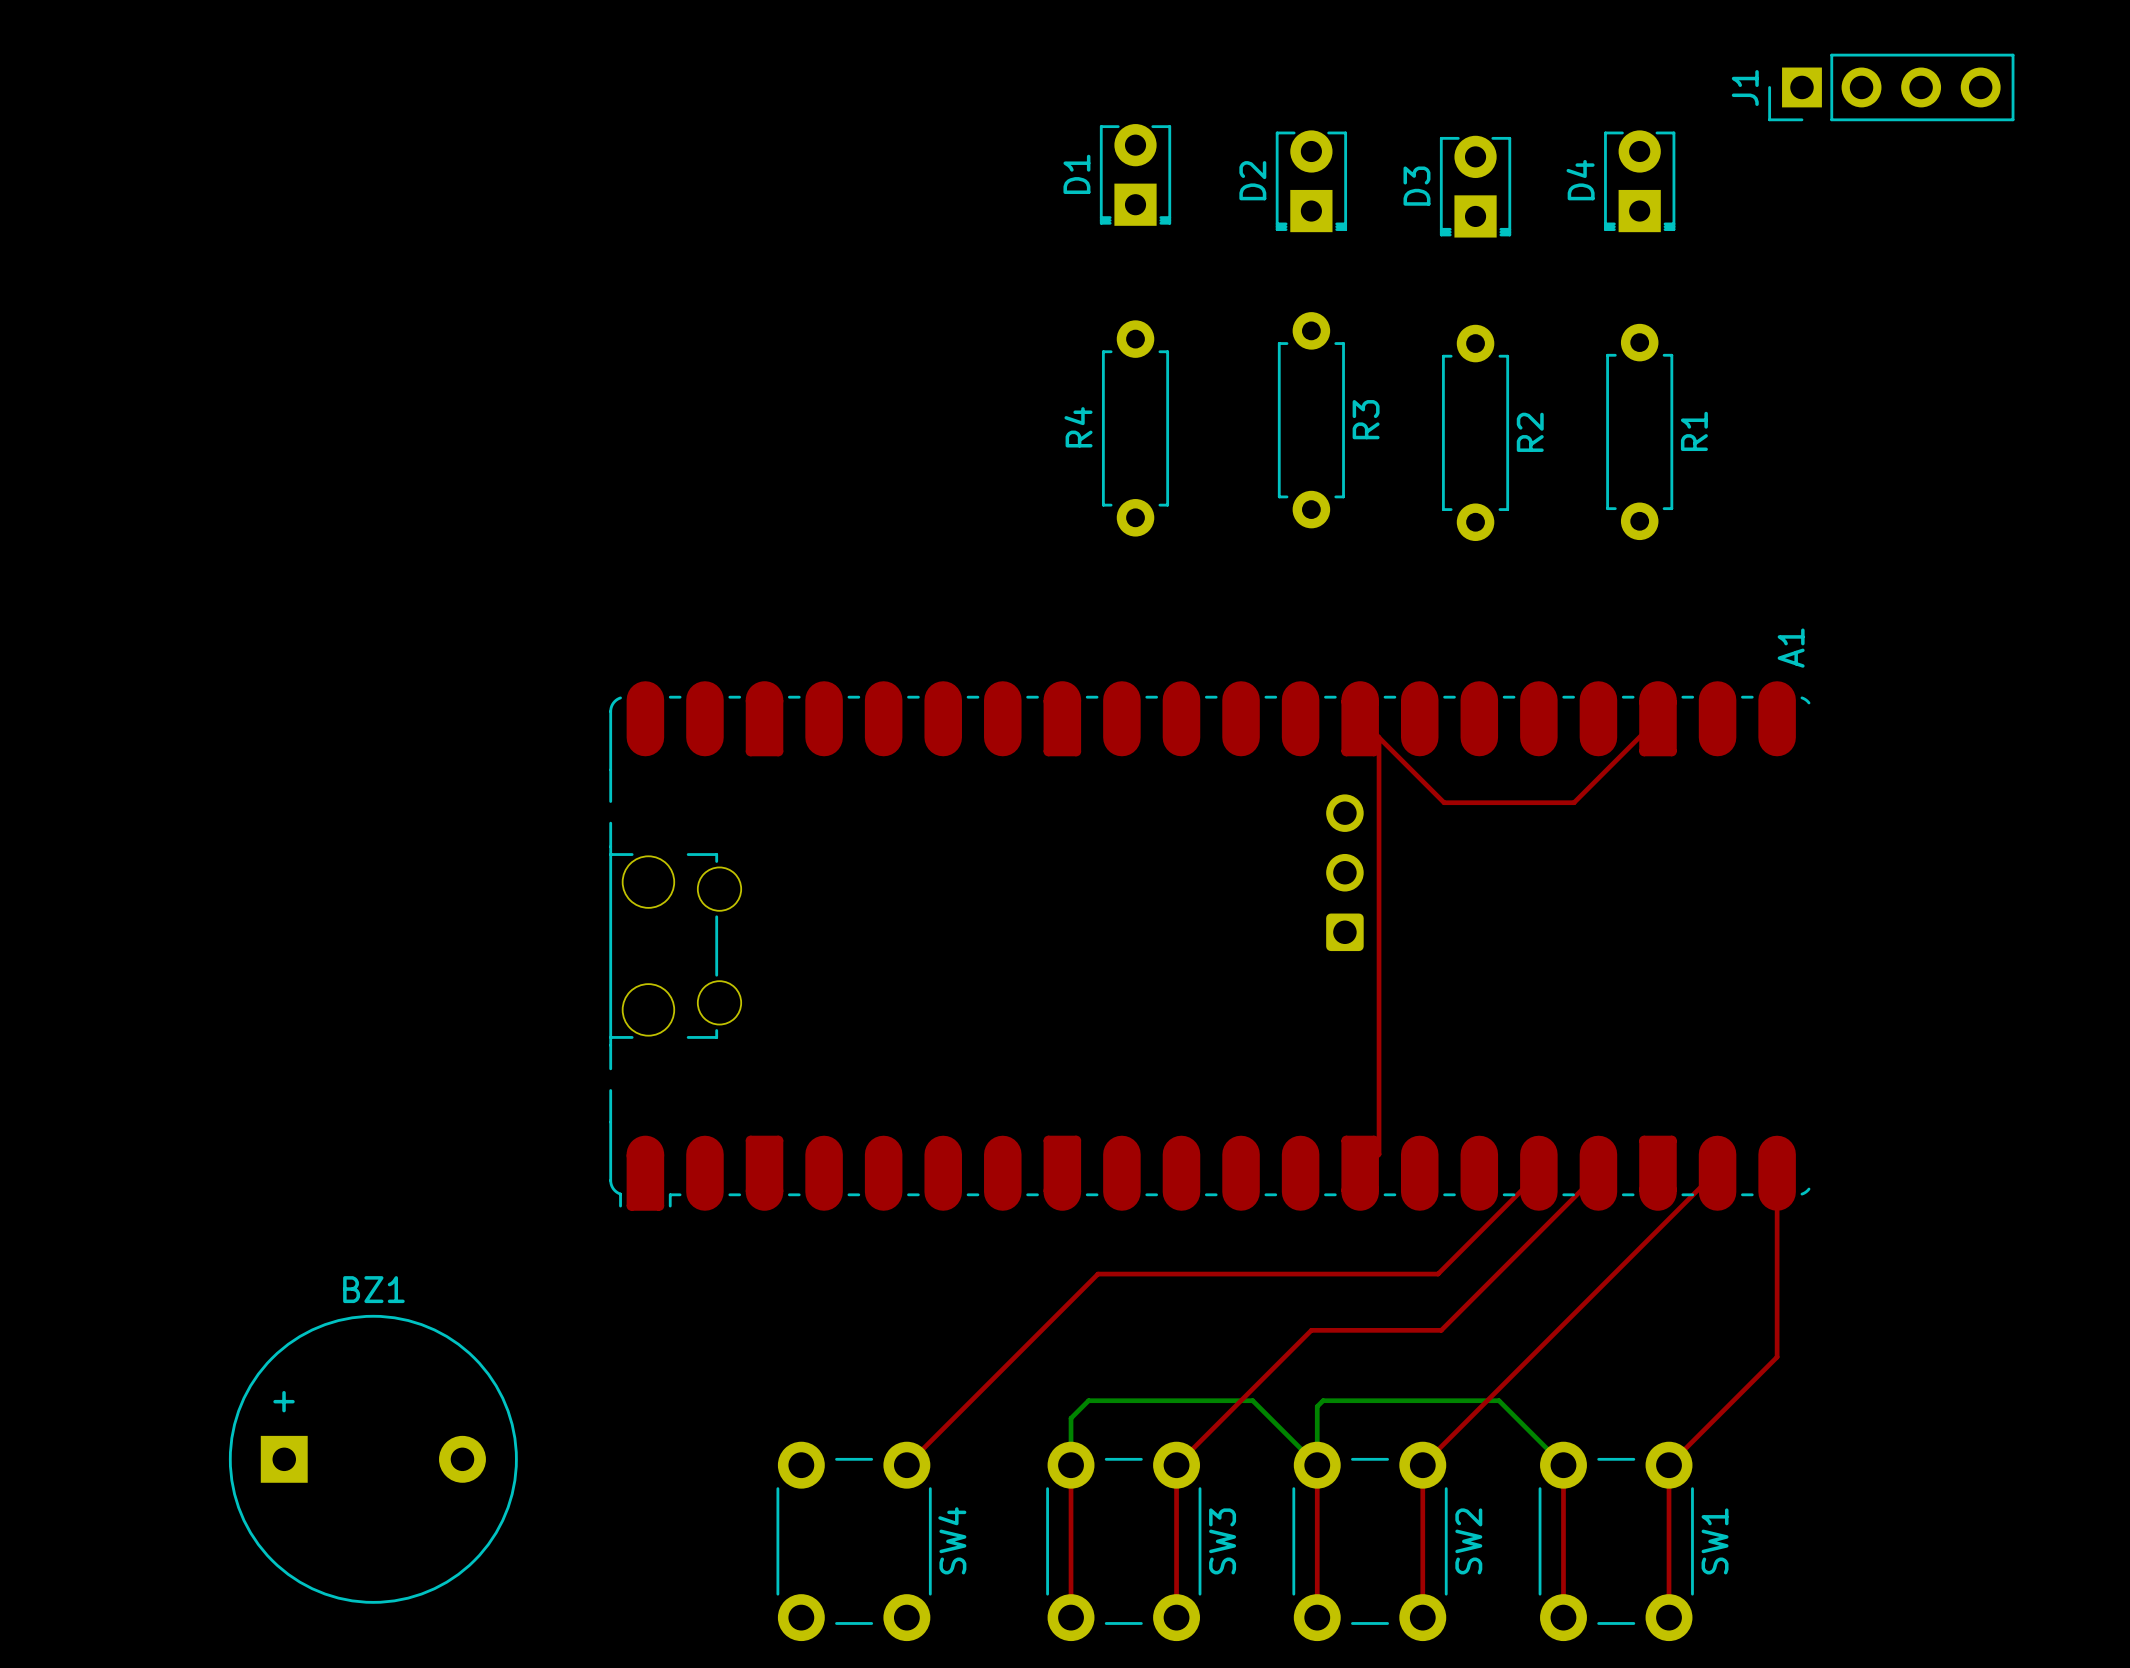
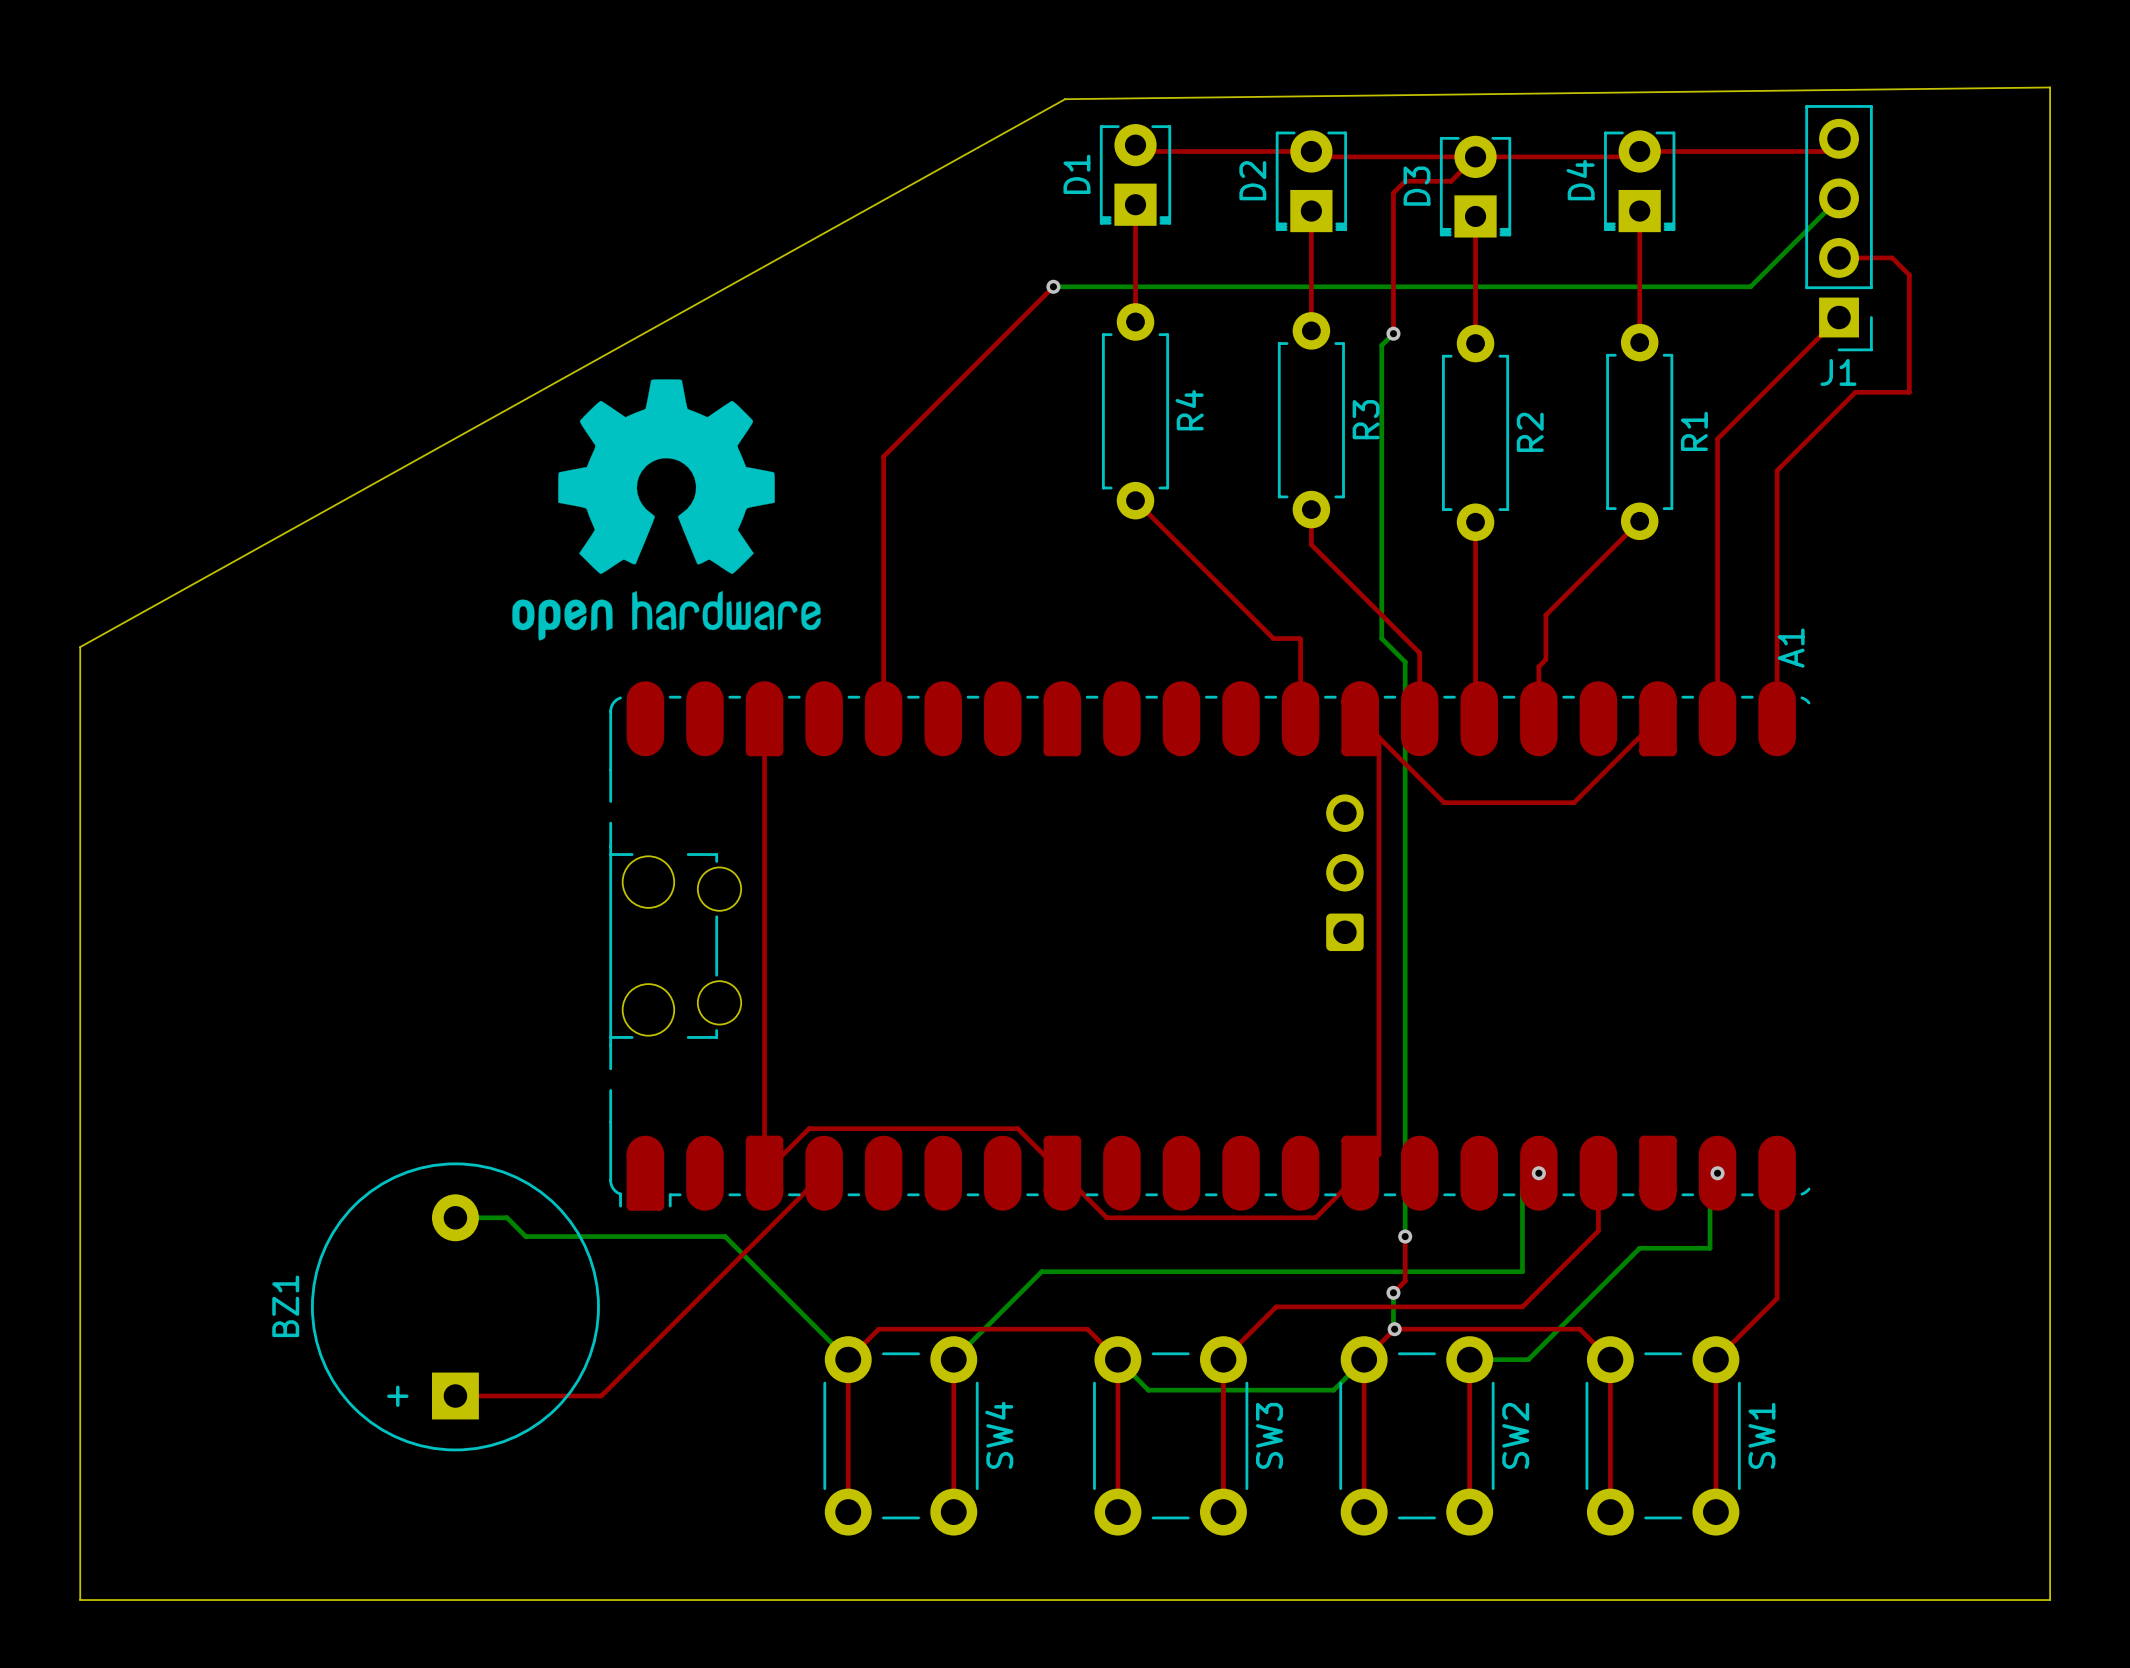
J1 rotation: 0° (1891, 87) -> 90° counterclockwise (1839, 228)
J1 position: (1891, 87) -> (1839, 228)
board edge: none -> (2050, 87) (1065, 99) (80, 647) (80, 1600) (2050, 1600) (2050, 87)
top track: none -> (1839, 138) (1826, 151) (1639, 151) (1634, 156) (1316, 156) (1311, 151) (1141, 151) (1135, 145)
top track: none -> (1475, 156) (1451, 181) (1405, 181) (1393, 192) (1393, 333)
bottom track: none -> (1839, 198) (1750, 286) (1053, 286)
top track: none -> (1135, 204) (1135, 321)
top track: none -> (1311, 211) (1311, 330)
top track: none -> (1639, 211) (1639, 342)
top track: none -> (1475, 216) (1475, 343)
top track: none -> (1839, 257) (1892, 257) (1909, 275) (1909, 392) (1855, 392) (1777, 470) (1777, 718)
top track: none -> (1053, 286) (883, 456) (883, 718)
via: none -> (1053, 286)
top track: none -> (1839, 317) (1717, 438) (1717, 718)
bottom track: none -> (1393, 333) (1381, 345) (1381, 638) (1405, 662) (1405, 1236)
via: none -> (1393, 333)
drawing: none -> [512, 379, 821, 641]
R4 name position: R4 (1078, 427) -> R4 (1189, 410)
R4 position: (1135, 428) -> (1135, 411)
top track: none -> (1135, 500) (1273, 638) (1300, 639) (1300, 718)
top track: none -> (1311, 509) (1311, 544) (1419, 653) (1419, 718)
top track: none -> (1639, 521) (1545, 615) (1545, 659) (1538, 666) (1538, 718)
top track: none -> (1475, 522) (1475, 715) (1479, 718)
top track: none -> (764, 718) (764, 1173) (809, 1128) (1017, 1128) (1106, 1217) (1315, 1217) (1360, 1173)
top track: none -> (824, 1173) (601, 1396) (455, 1396)
top track: (1538, 1173) (1438, 1274) (1097, 1274) (906, 1465) -> none
bottom track: none -> (1538, 1173) (1522, 1189) (1522, 1271) (1041, 1271) (953, 1359)
via: none -> (1538, 1173)
top track: (1598, 1173) (1441, 1330) (1311, 1330) (1176, 1465) (1176, 1617) -> (1598, 1173) (1598, 1230) (1522, 1306) (1276, 1306) (1223, 1359) (1223, 1512)
top track: (1714, 1173) (1422, 1465) (1422, 1617) -> none
bottom track: none -> (1717, 1173) (1710, 1180) (1710, 1248) (1639, 1248) (1528, 1359) (1469, 1359)
via: none -> (1717, 1173)
bottom track: none -> (455, 1217) (507, 1217) (525, 1236) (725, 1236) (848, 1359)
top track: none -> (1405, 1236) (1405, 1281) (1393, 1292)
via: none -> (1405, 1236)
bottom track: none -> (1393, 1292) (1394, 1329)
via: none -> (1393, 1292)
top track: (1777, 1298) (1777, 1357) (1669, 1465) (1669, 1617) -> (1777, 1298) (1715, 1359) (1715, 1512)
via: none -> (1394, 1329)
bottom track: none -> (1117, 1359) (1148, 1390) (1333, 1390) (1364, 1359)
BZ1 rotation: 0° (373, 1459) -> 90° counterclockwise (455, 1306)
top track: (1071, 1465) (1071, 1617) -> (953, 1359) (953, 1512)
bottom track: (1071, 1465) (1071, 1418) (1088, 1400) (1252, 1400) (1317, 1465) (1317, 1406) (1323, 1400) (1499, 1400) (1563, 1465) -> none
top track: (1317, 1465) (1317, 1617) -> none
top track: (1563, 1465) (1563, 1617) -> (1469, 1359) (1469, 1512)
top track: none -> (848, 1512) (848, 1359) (878, 1329) (1087, 1329) (1117, 1359) (1117, 1512)
top track: none -> (1364, 1512) (1364, 1359) (1394, 1329) (1579, 1329) (1610, 1359) (1610, 1512)
SW4 position: (854, 1541) -> (901, 1435)
SW3 position: (1123, 1541) -> (1170, 1435)
SW2 position: (1370, 1541) -> (1416, 1435)
SW1 position: (1616, 1541) -> (1663, 1435)

